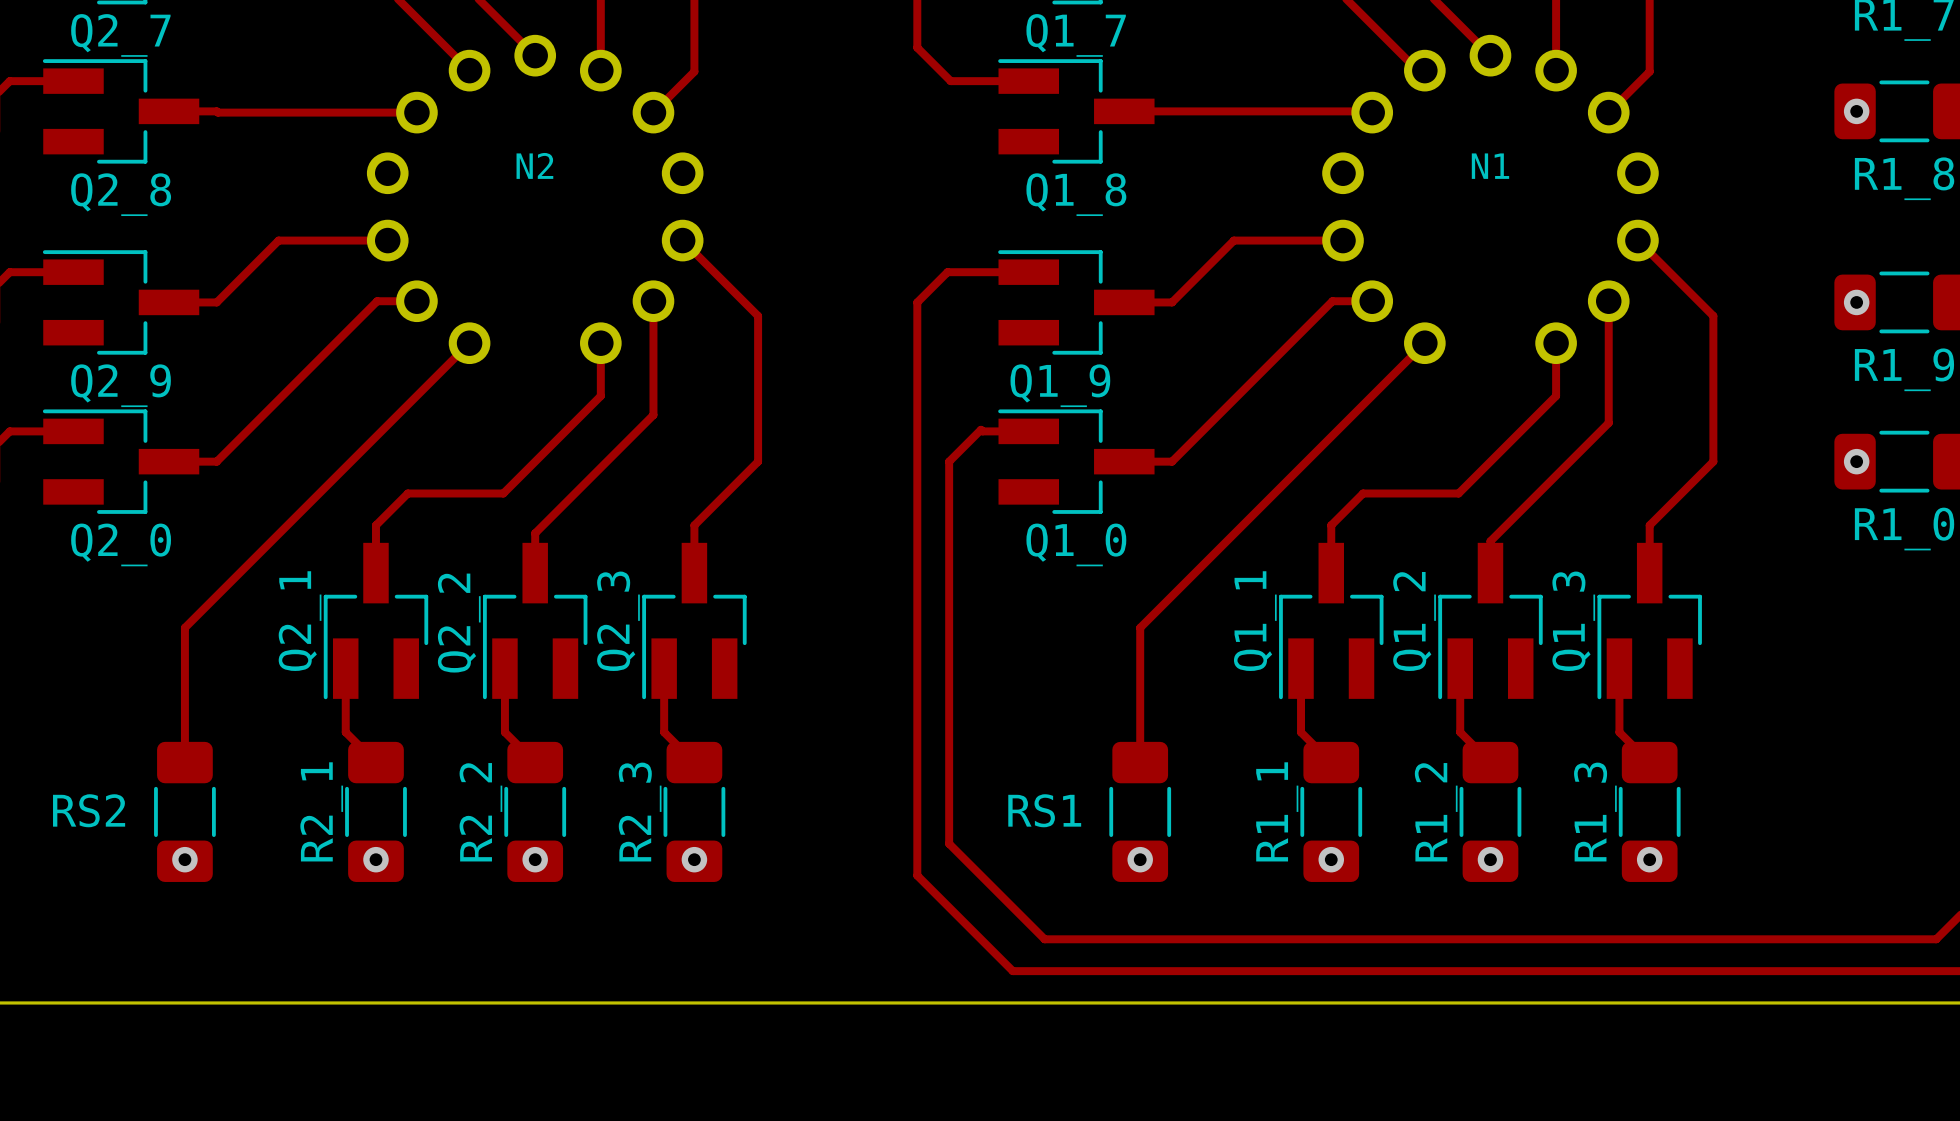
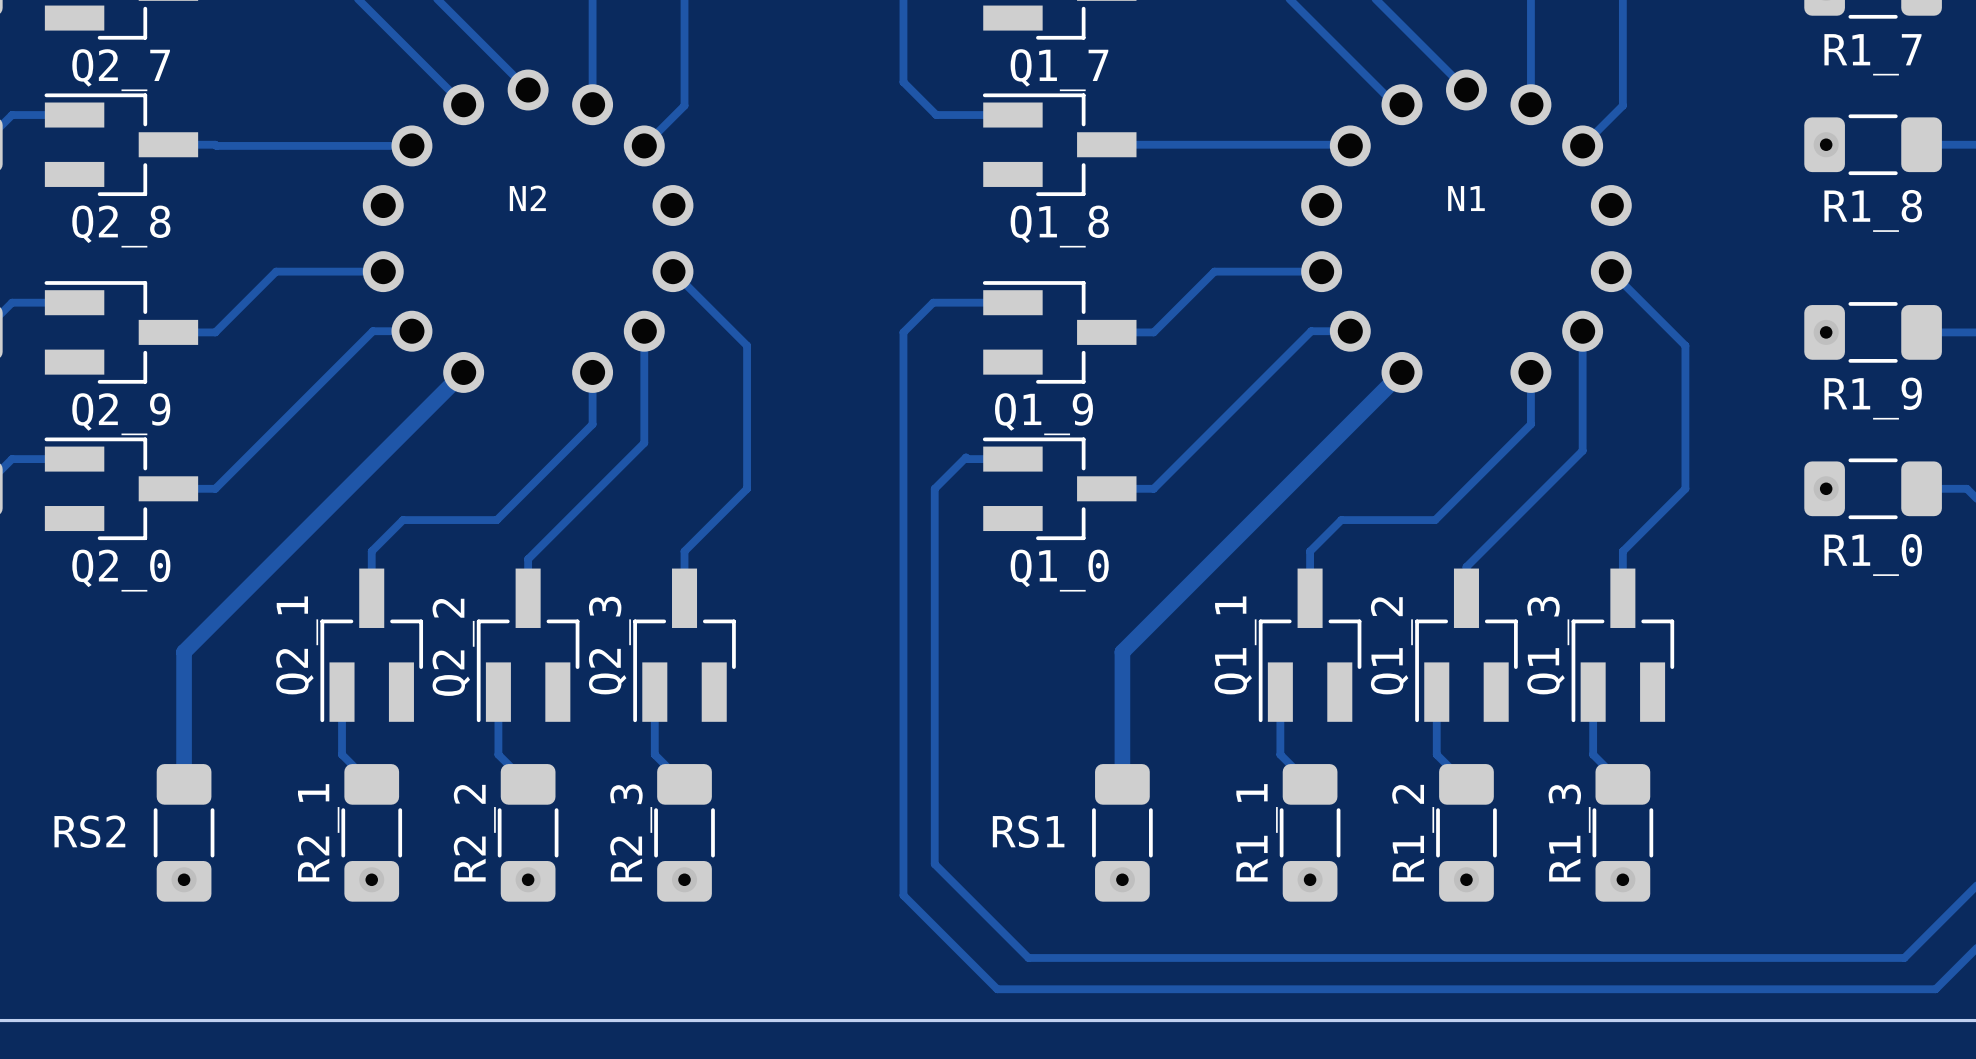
track width: thin (469, 343) (184, 627) (184, 762) -> thick (463, 372) (184, 652) (184, 784)
track width: thin (1424, 343) (1140, 627) (1140, 762) -> thick (1402, 372) (1122, 652) (1122, 784)

